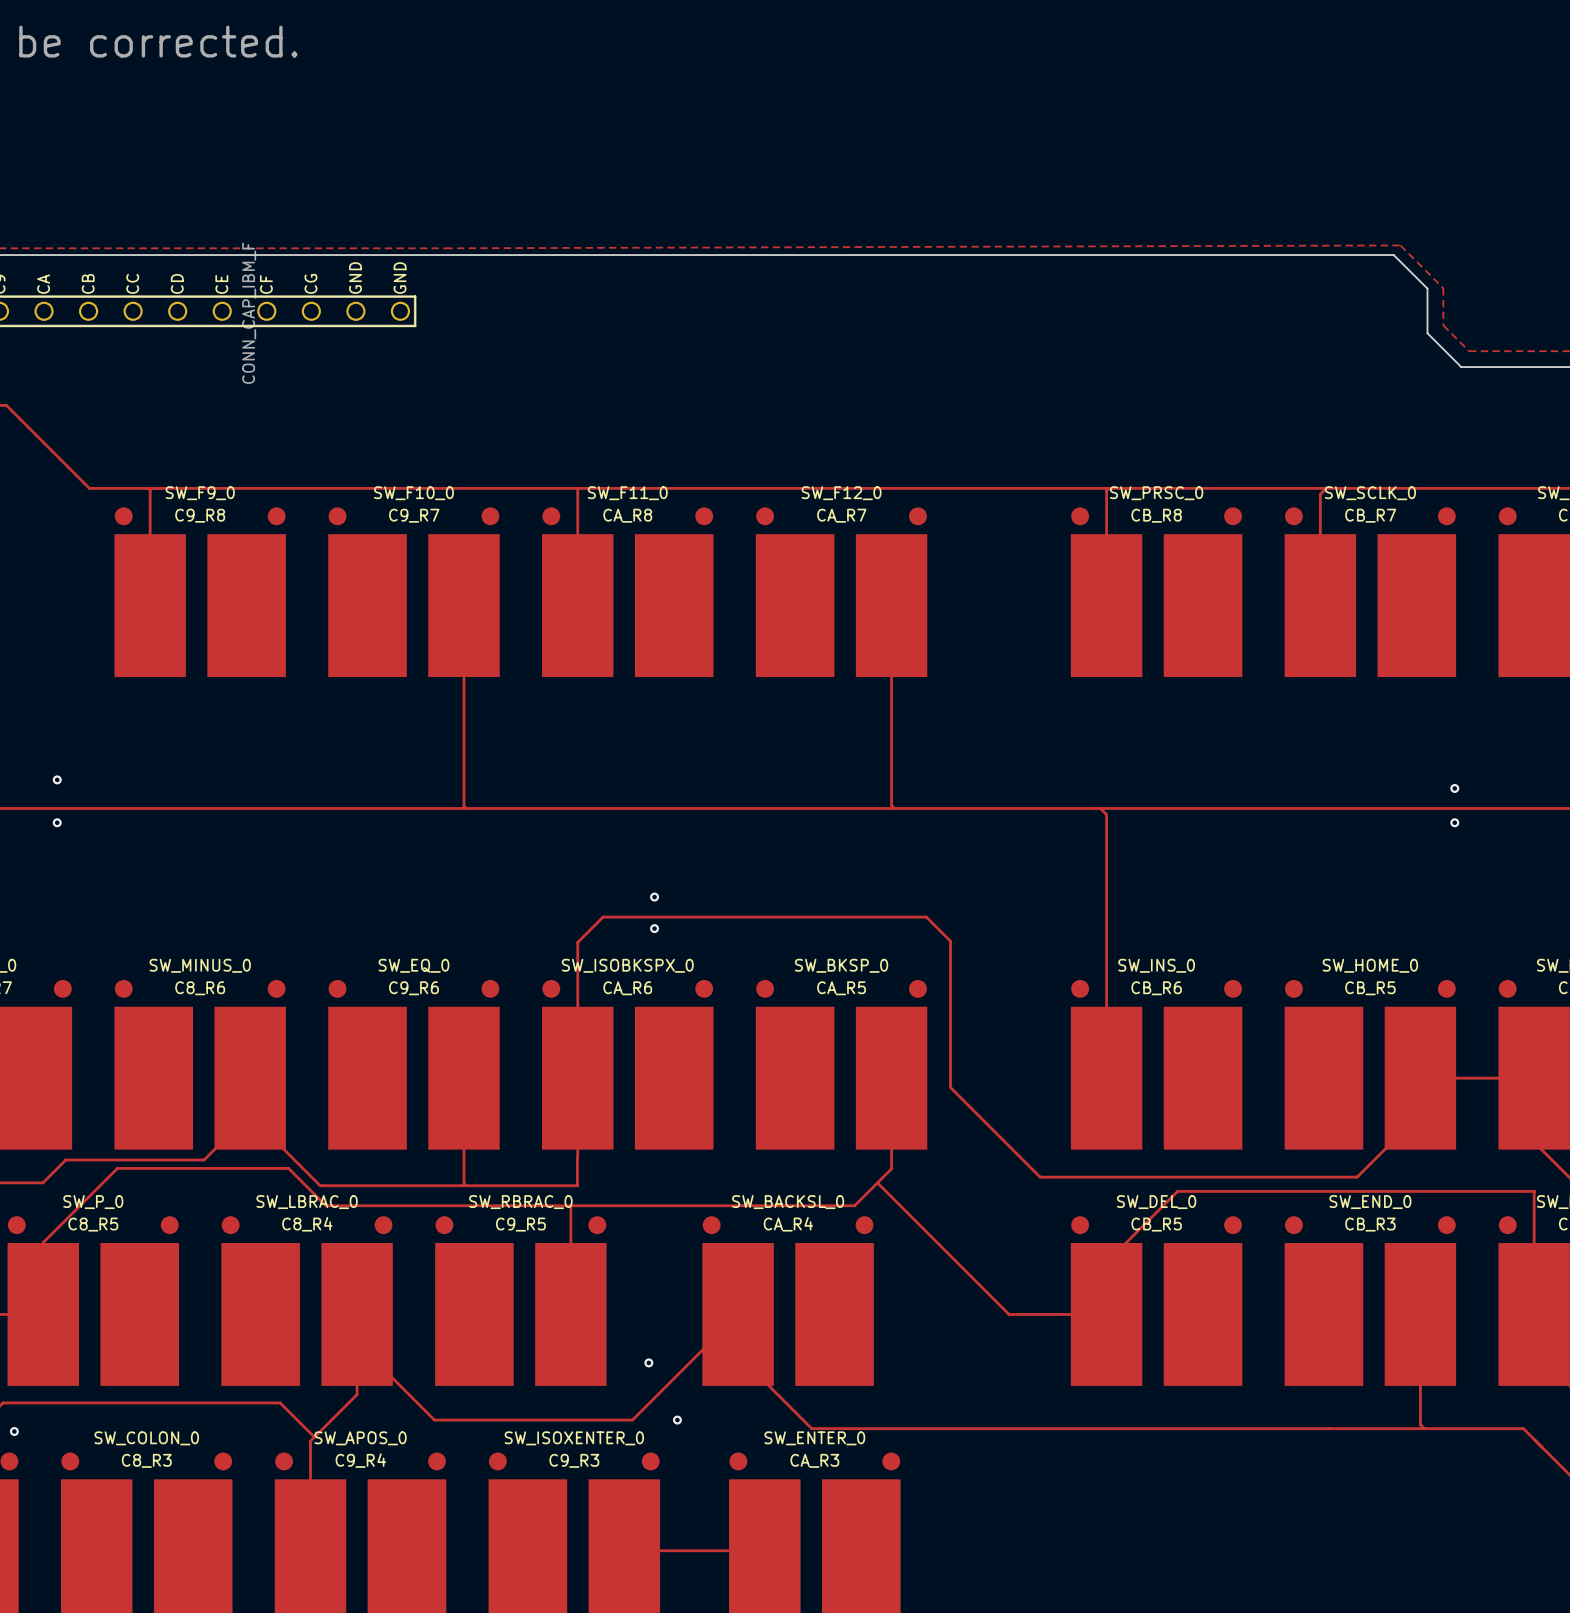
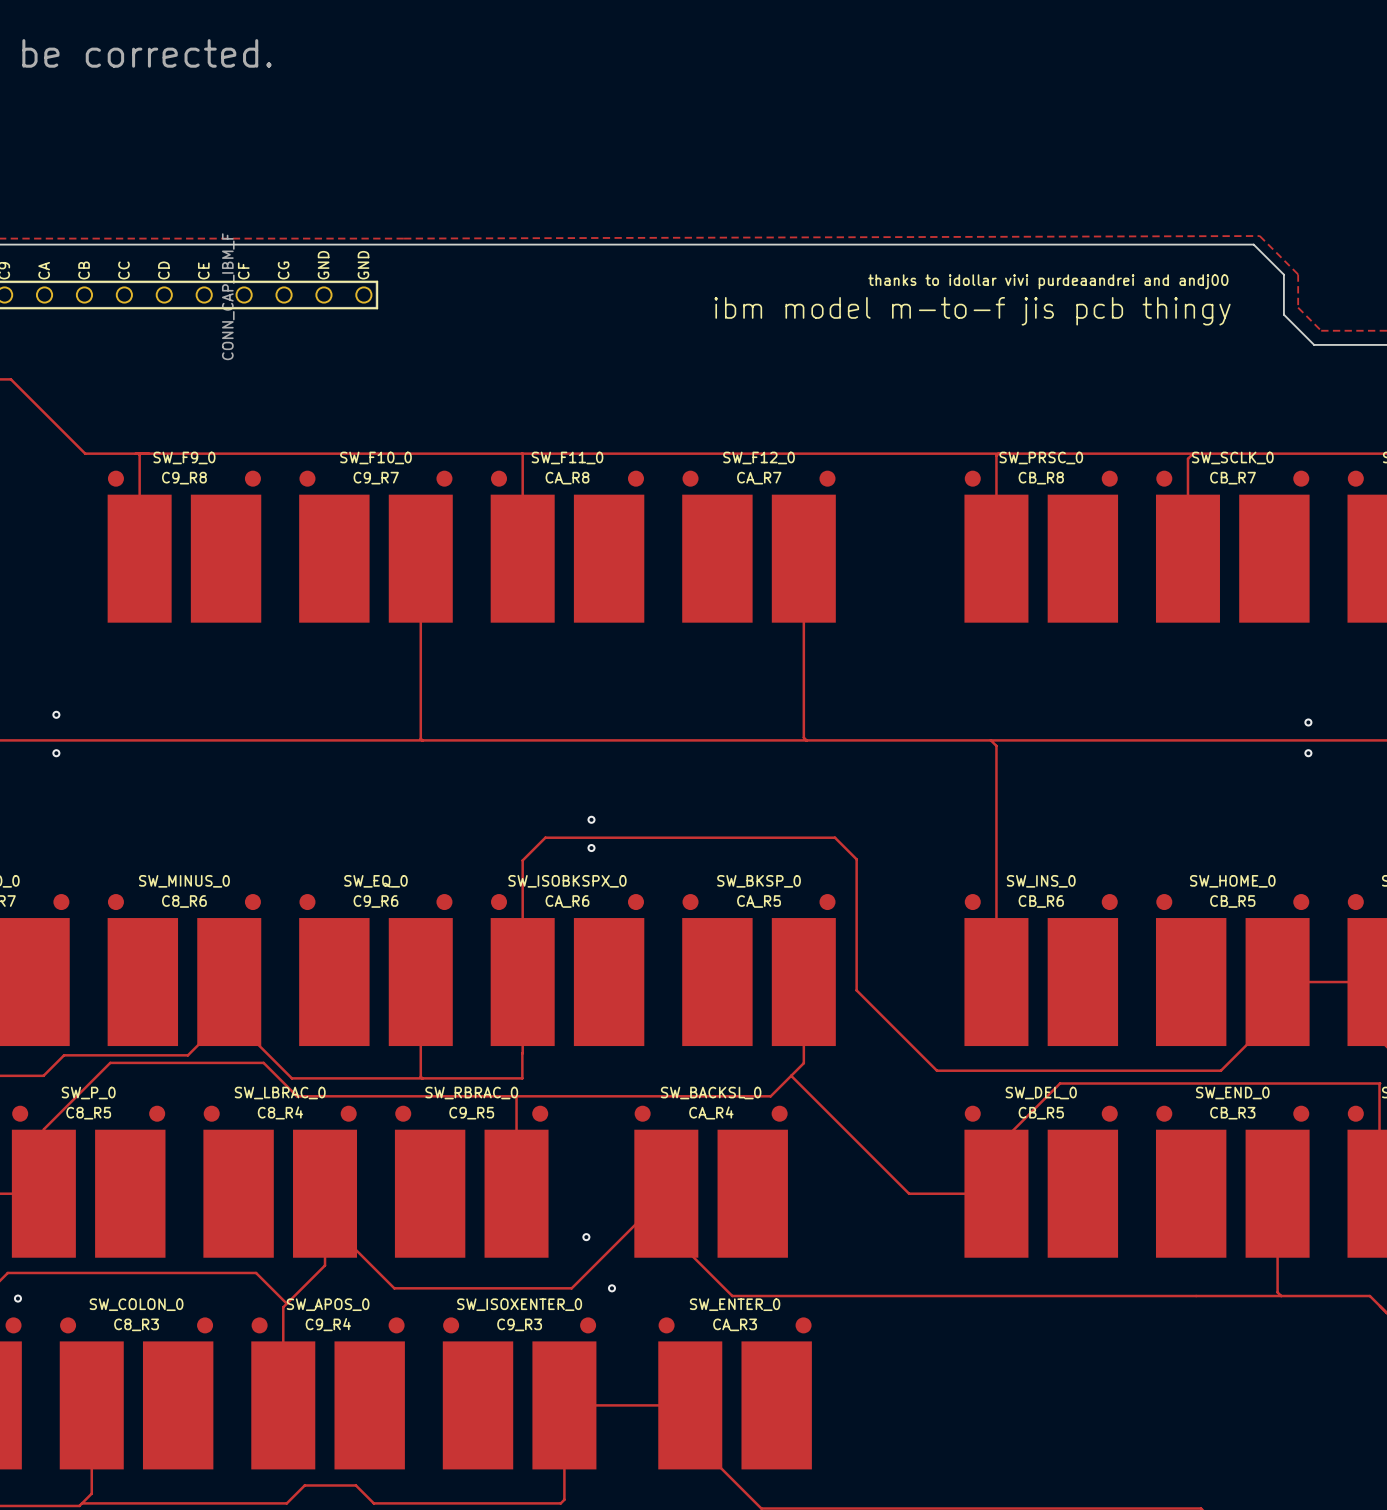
text: none -> thanks to idollar vivi purdeaandrei and andj00 (1048, 281)
text: none -> ibm model m-to-f jis pcb thingy (972, 311)

